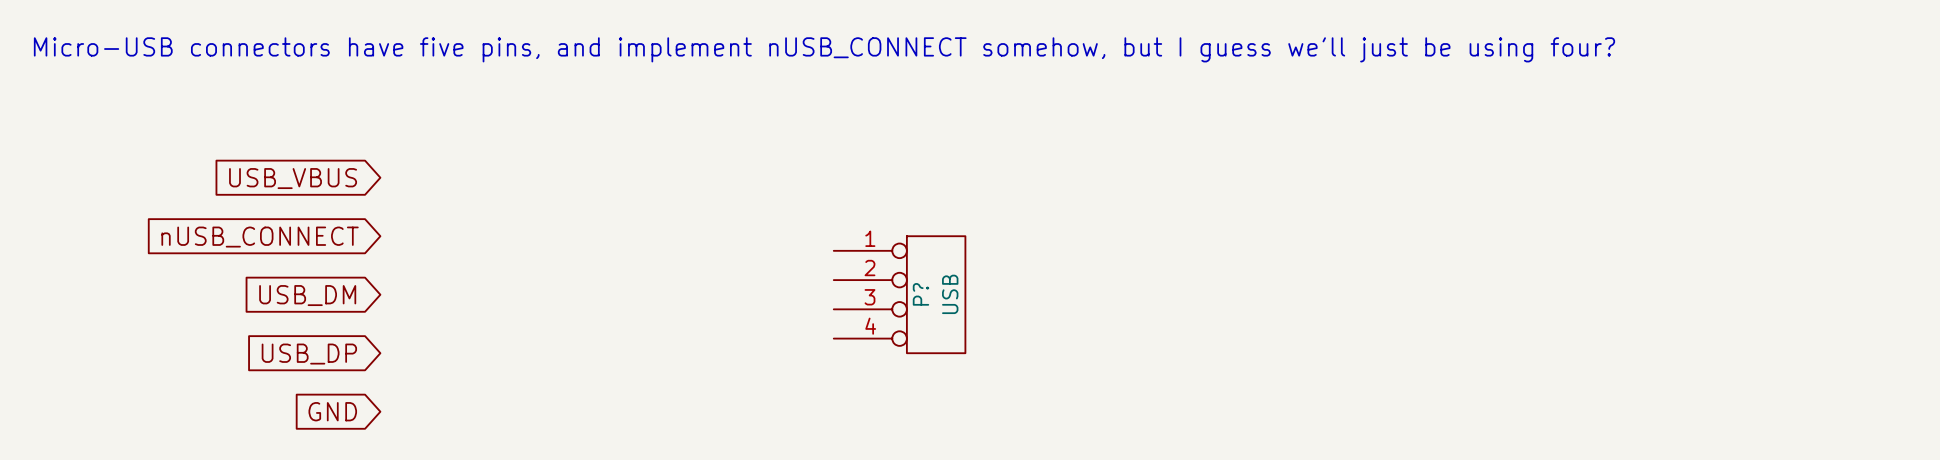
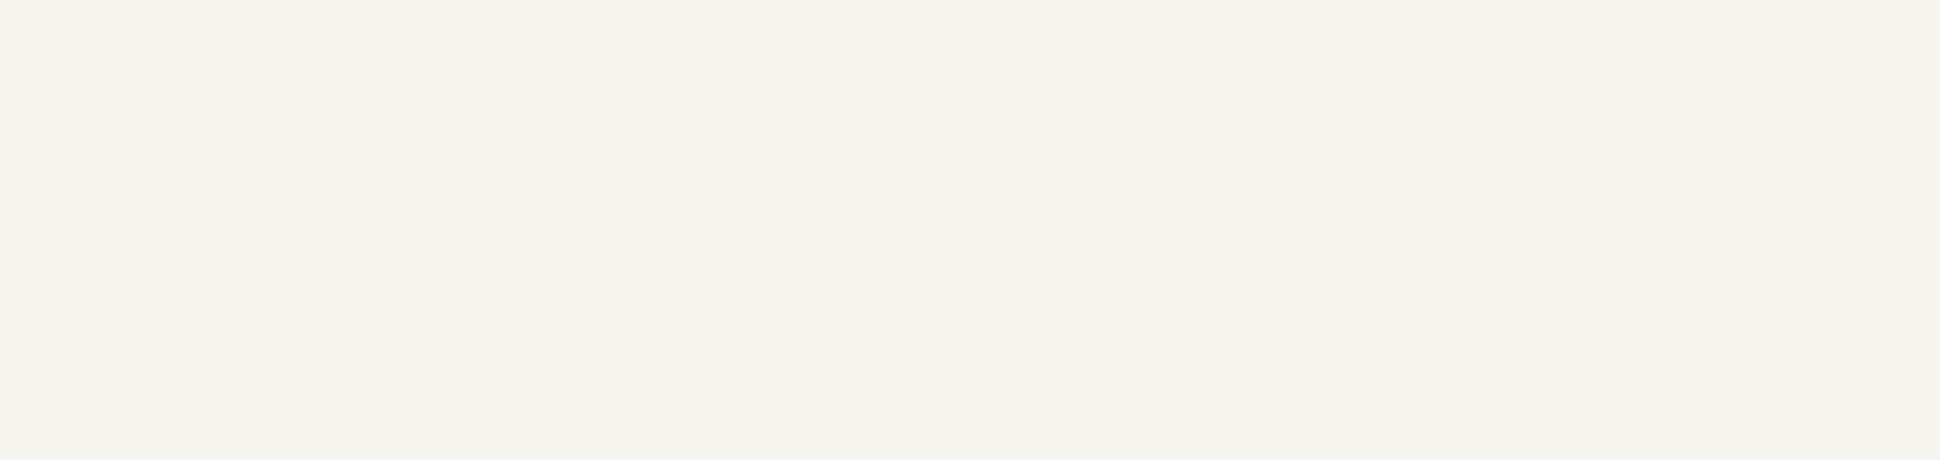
text: Micro-USB connectors have five pins, and implement nUSB_CONNECT somehow, but I guess we'll just be using four? (824, 49) -> none
global label: USB_VBUS (293, 178) -> none
global label: nUSB_CONNECT (260, 237) -> none
P?: USB (899, 294) -> none
global label: USB_DM (307, 295) -> none
global label: USB_DP (309, 354) -> none
global label: GND (332, 411) -> none

